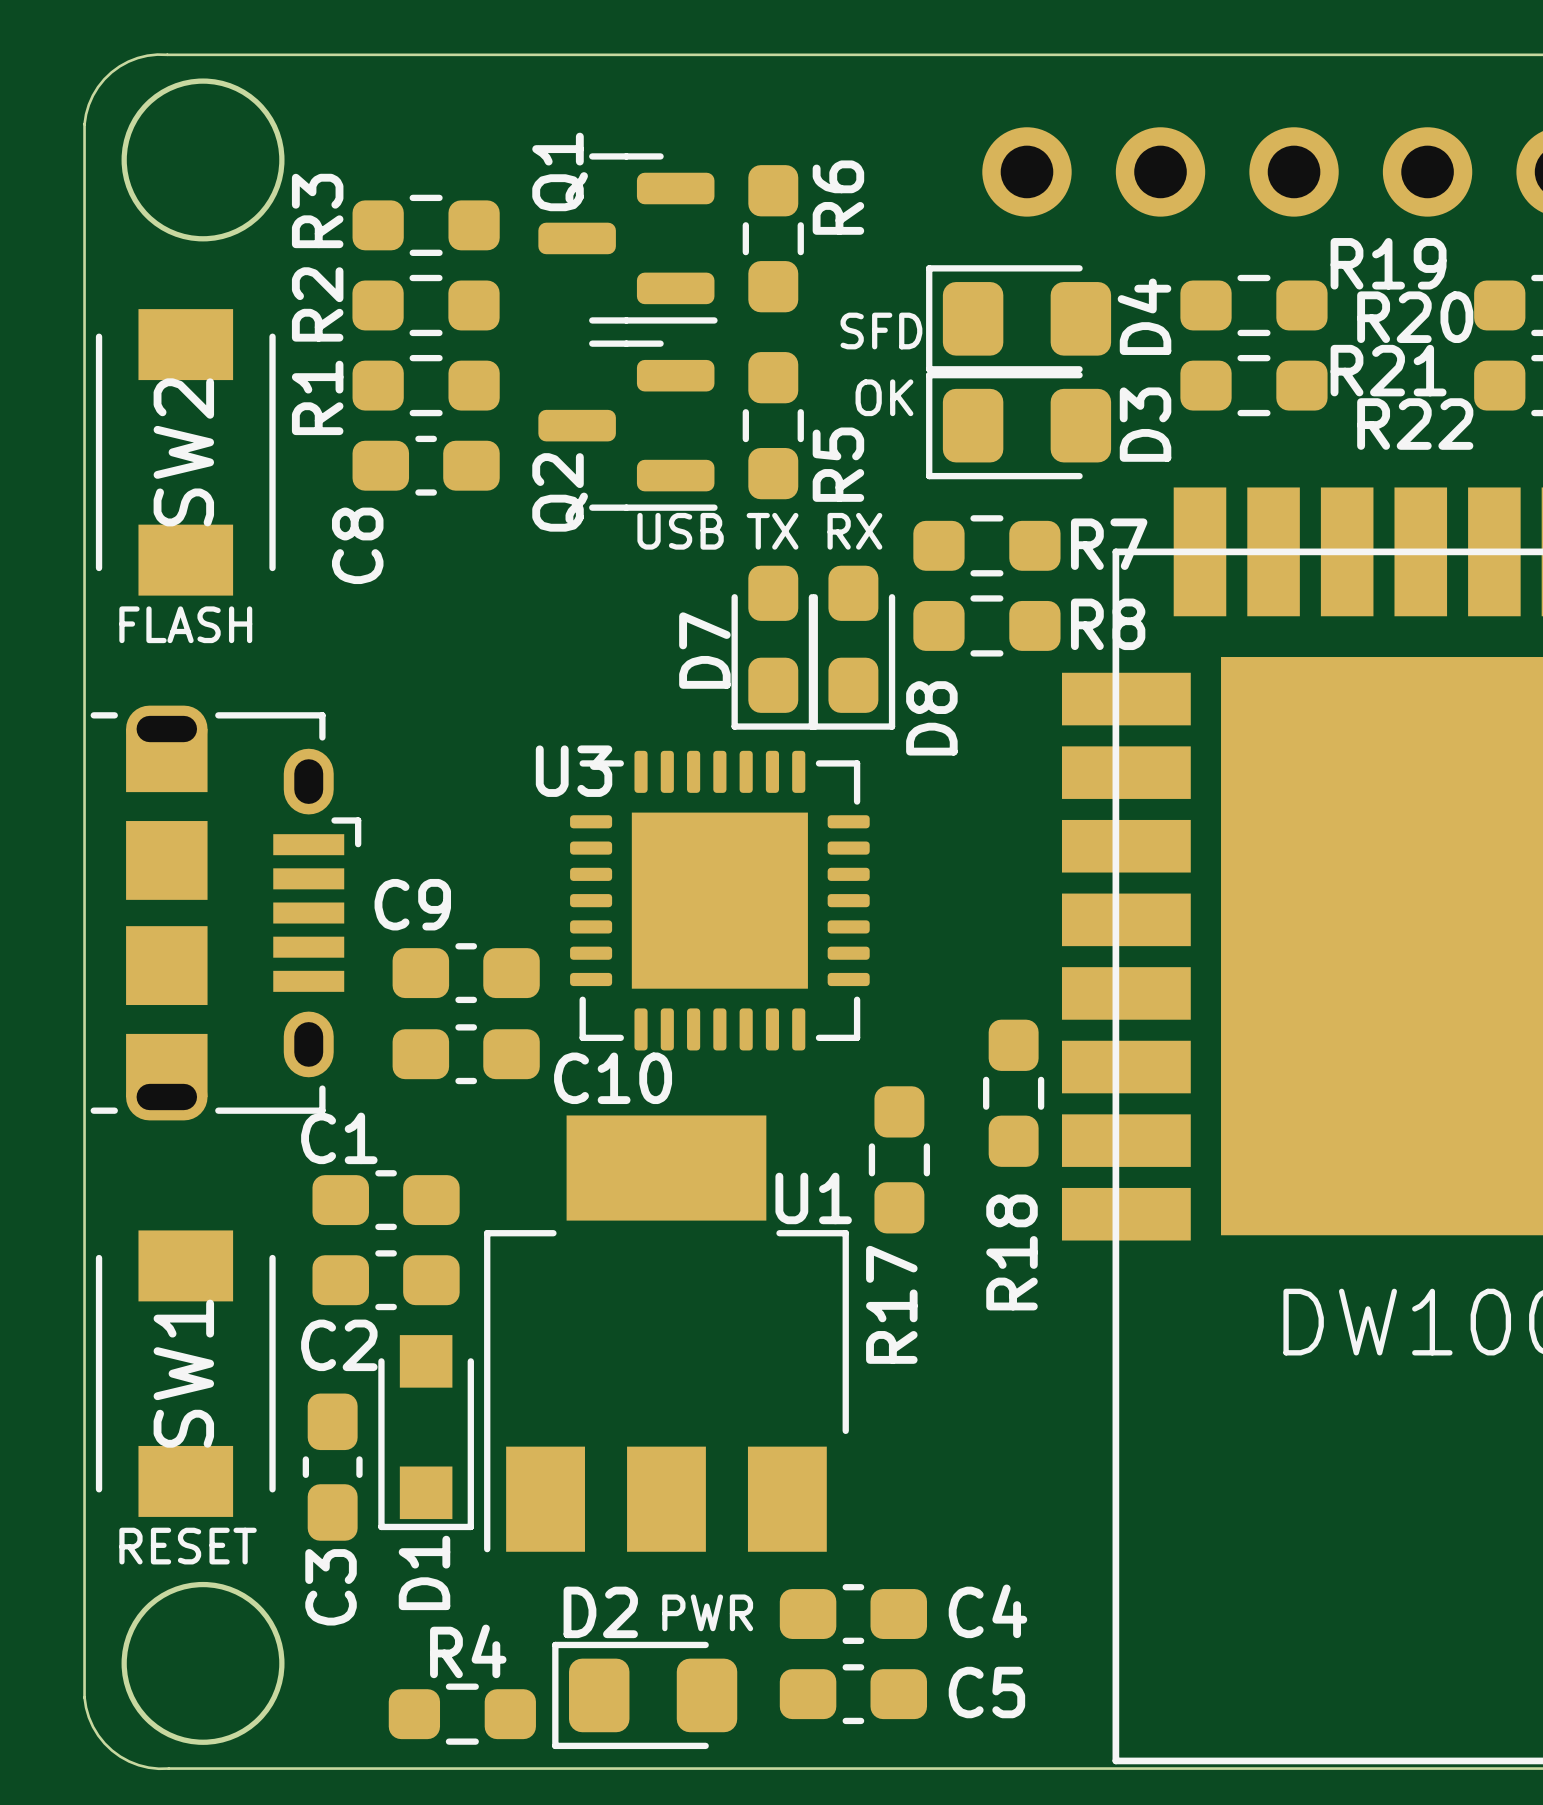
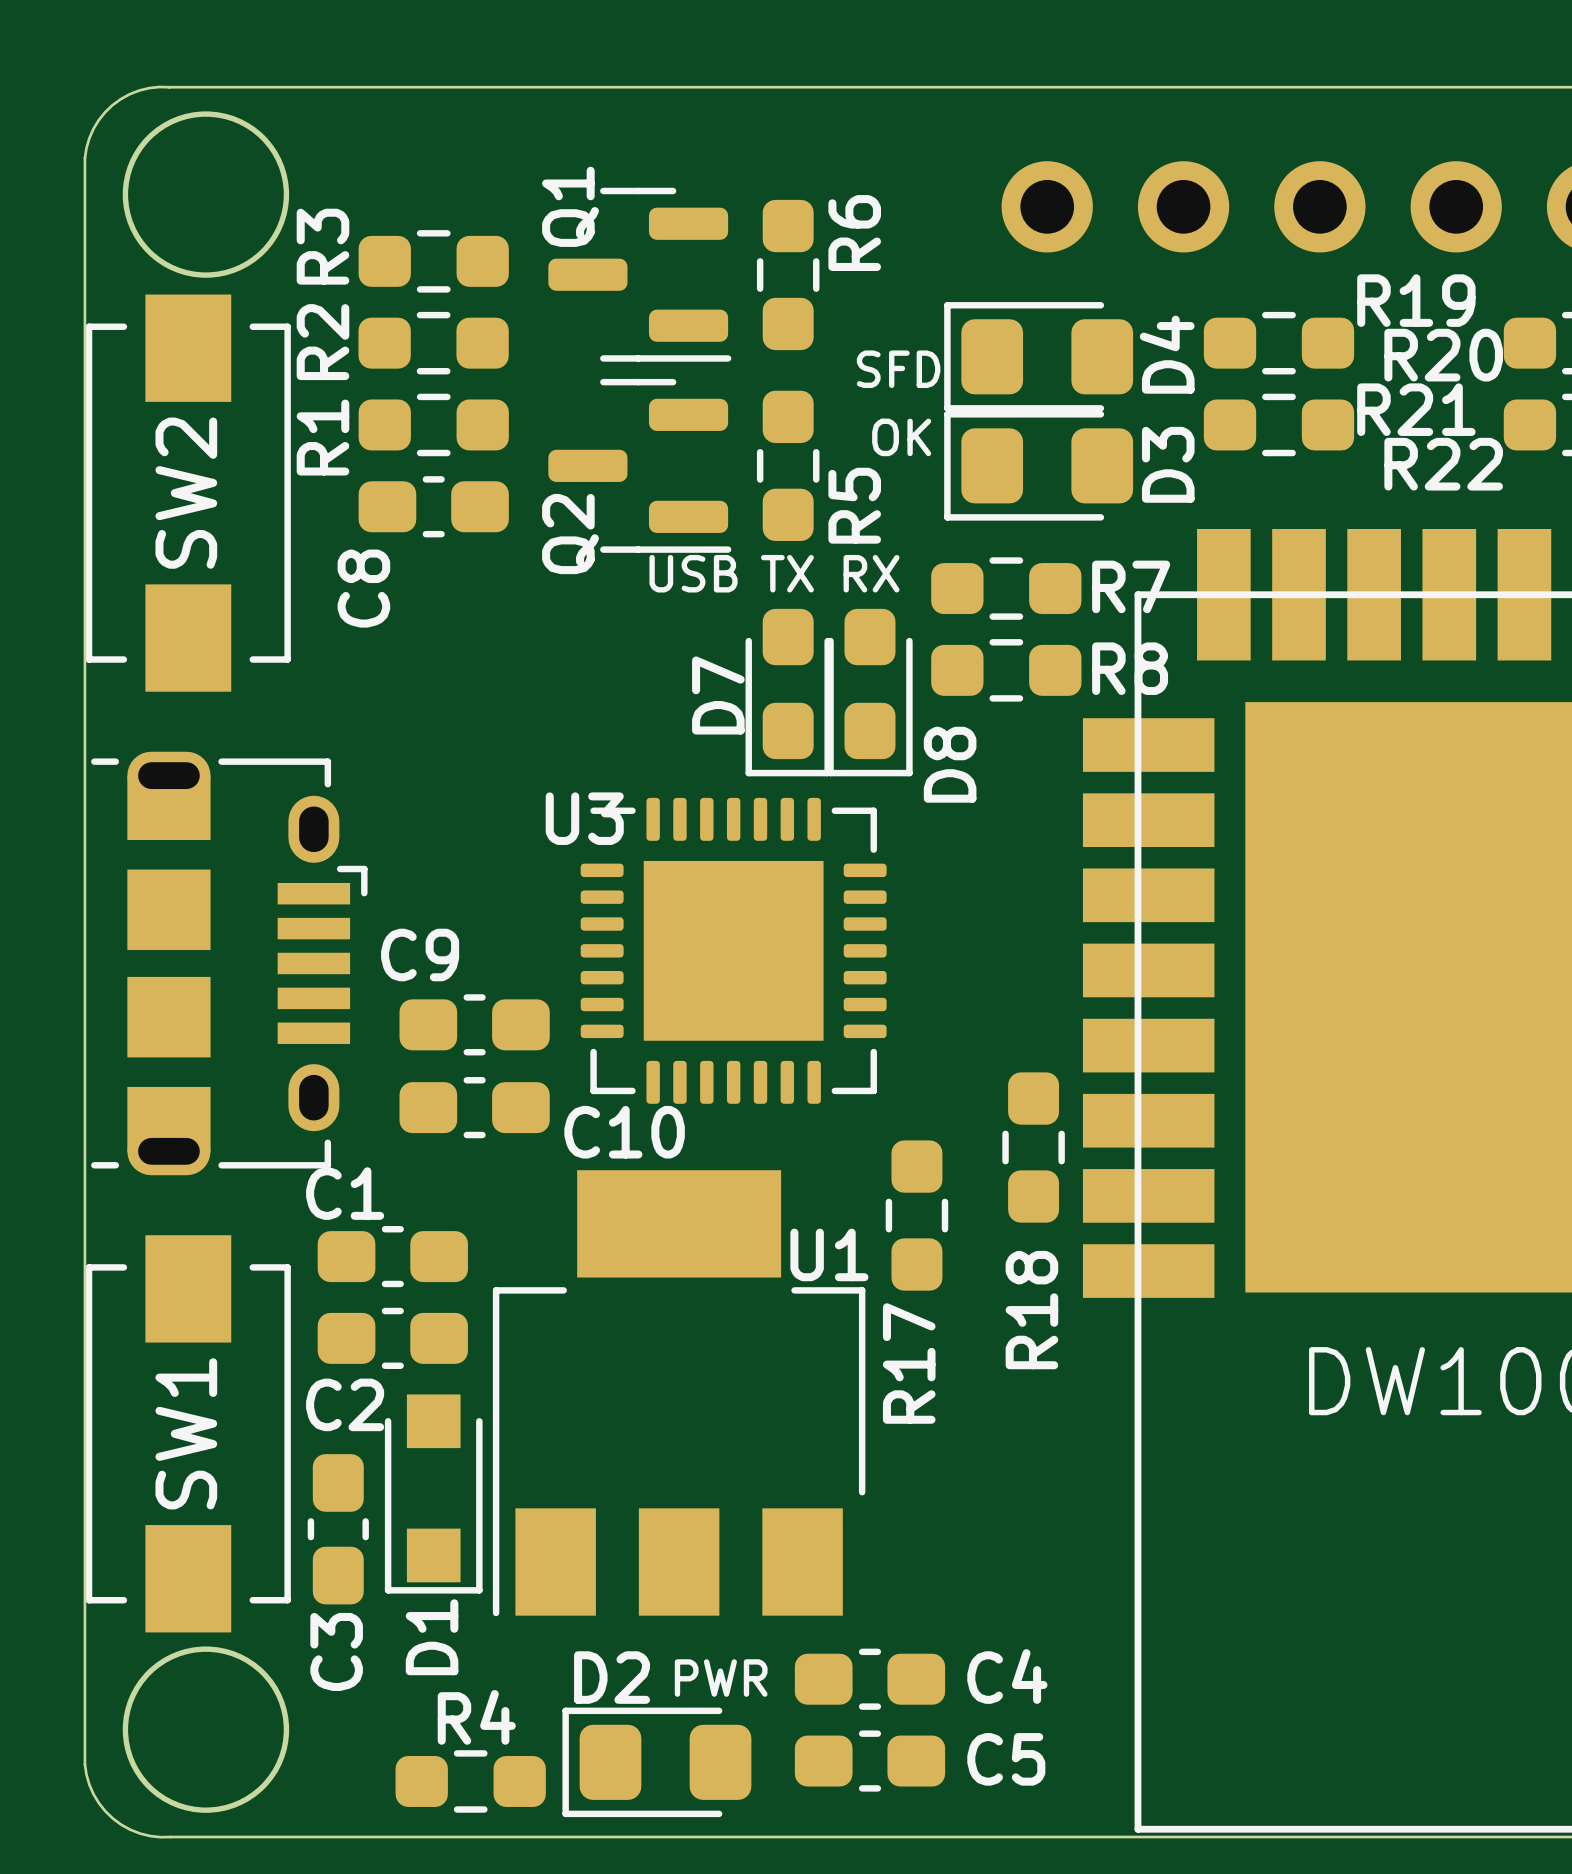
SW2 footprint: [95, 309, 276, 596] -> [85, 294, 291, 692]
text: FLASH (185, 624) -> none
SW1 footprint: [95, 1230, 276, 1517] -> [85, 1235, 291, 1633]
text: RESET (188, 1546) -> none

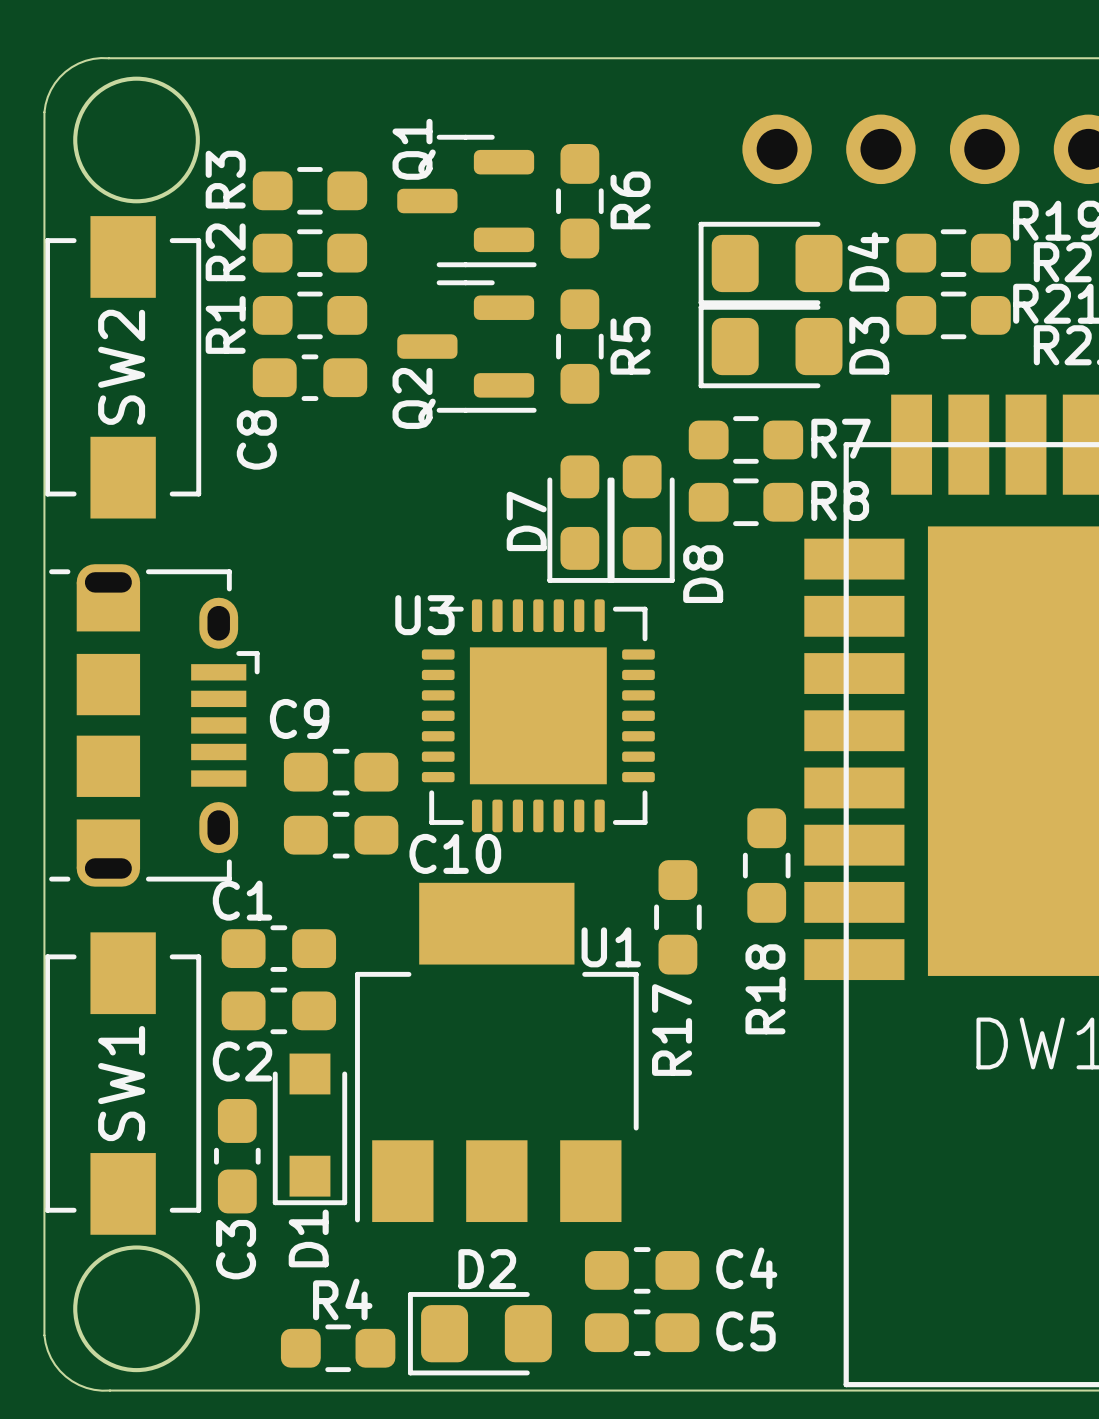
R6 name position: R6 (854, 233) -> R6 (630, 200)
text: SFD (898, 369) -> none
text: OK (901, 437) -> none
R5 name position: R5 (854, 505) -> R5 (630, 345)
text: USB (693, 573) -> none
text: TX (787, 573) -> none
text: RX (871, 573) -> none
D2 name position: D2 (612, 1677) -> D2 (487, 1269)
text: PWR (721, 1678) -> none

